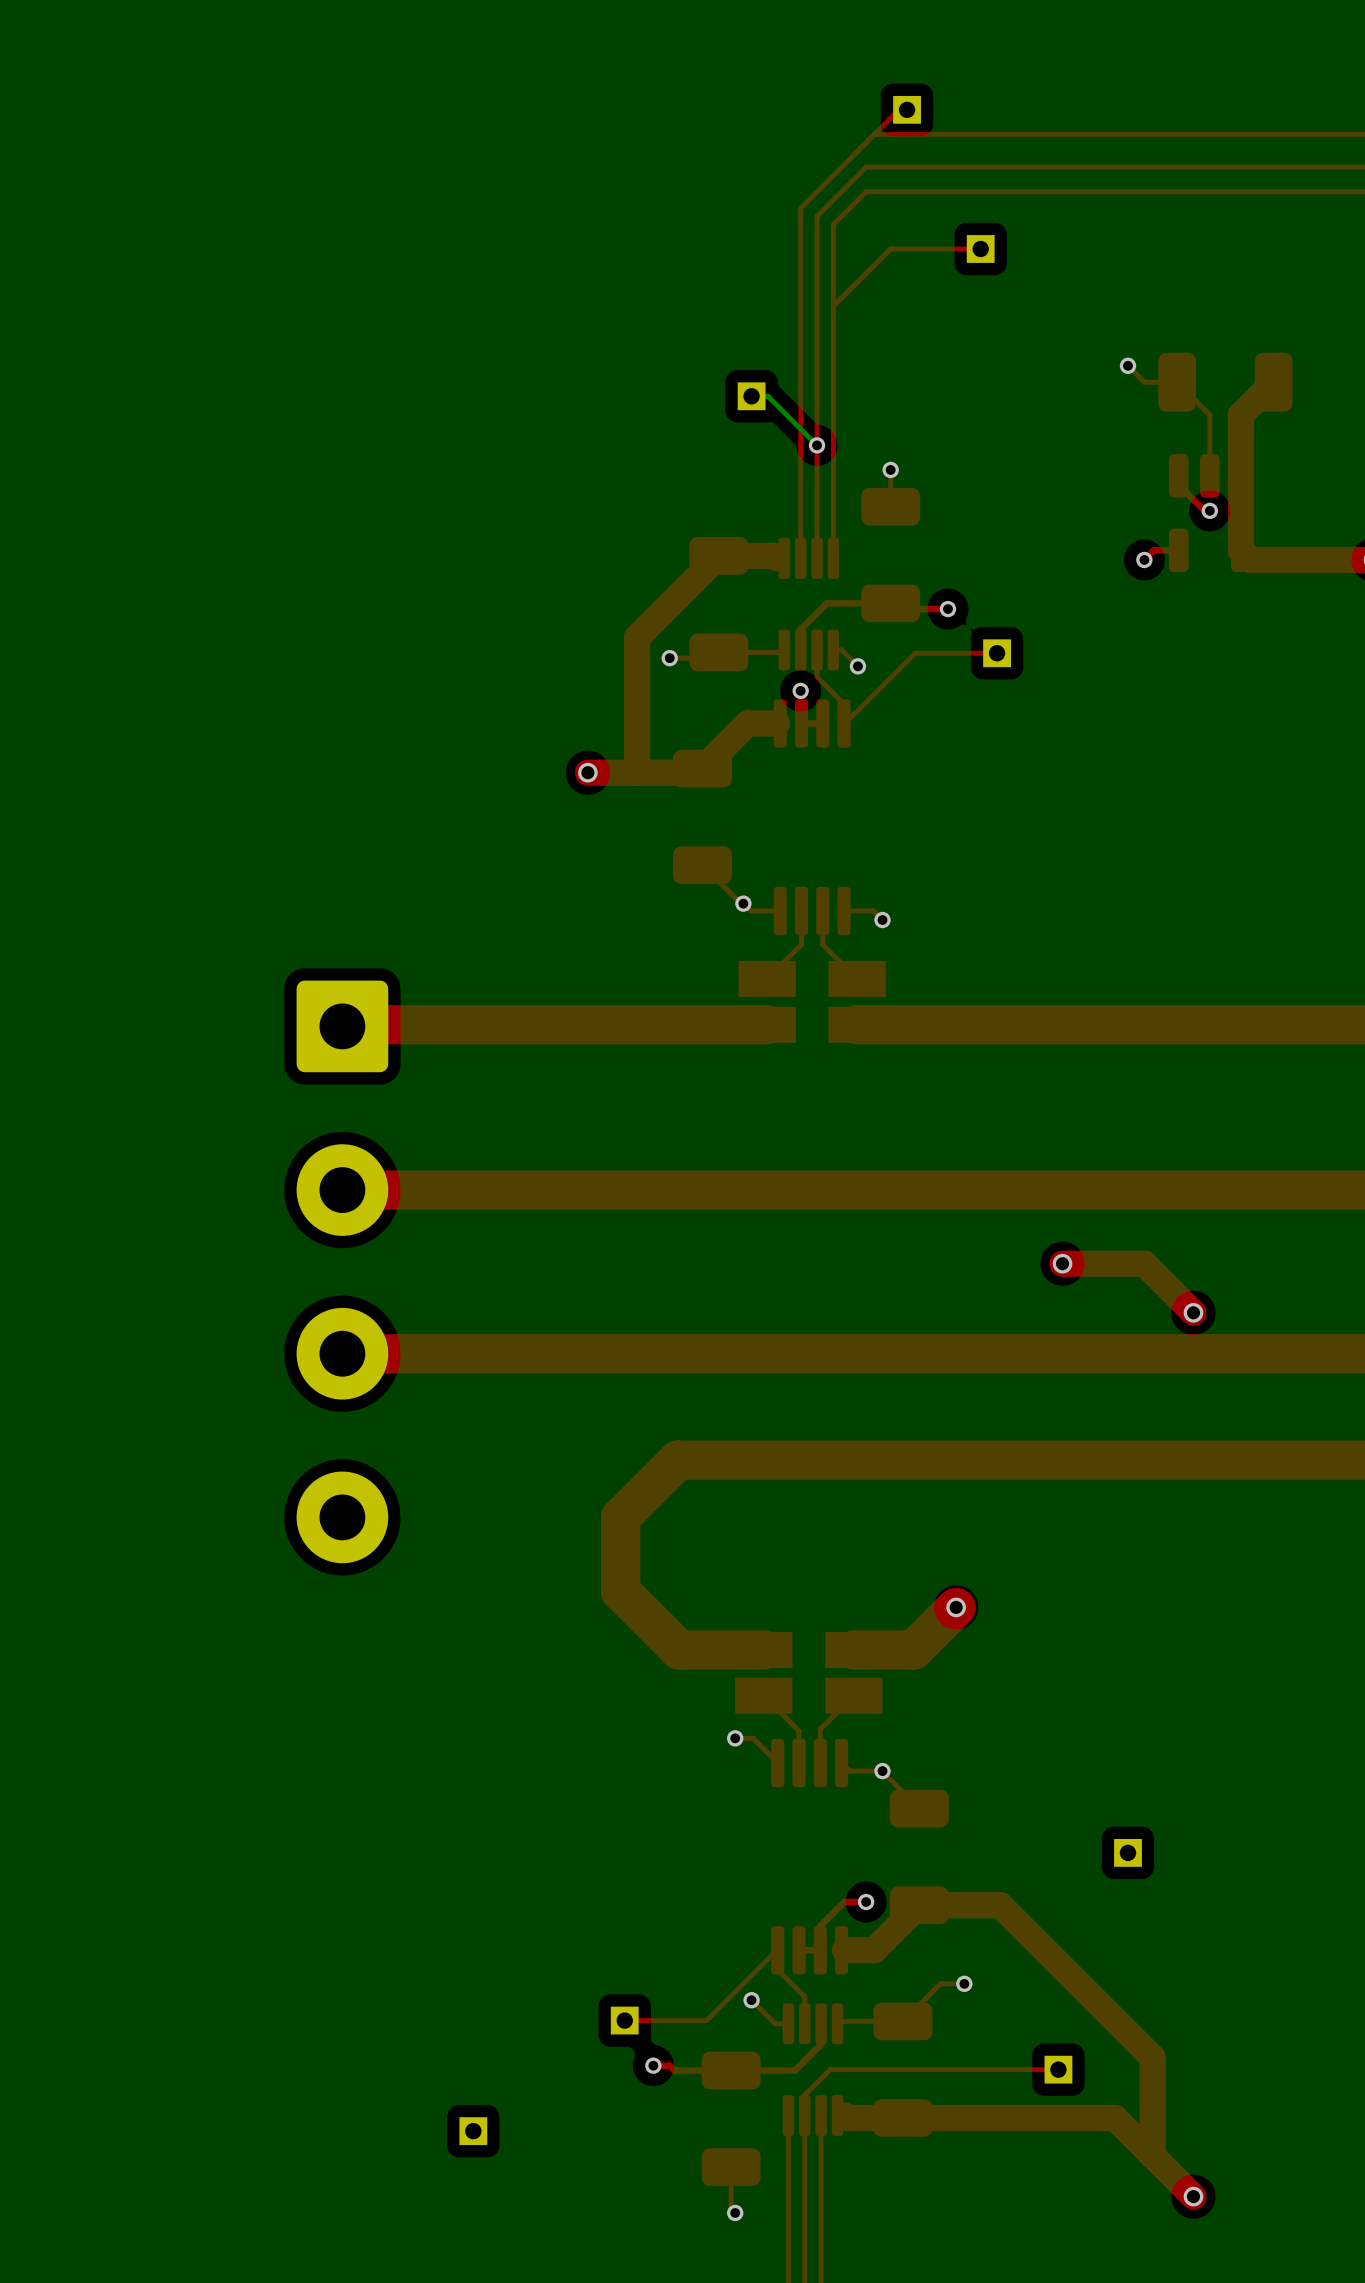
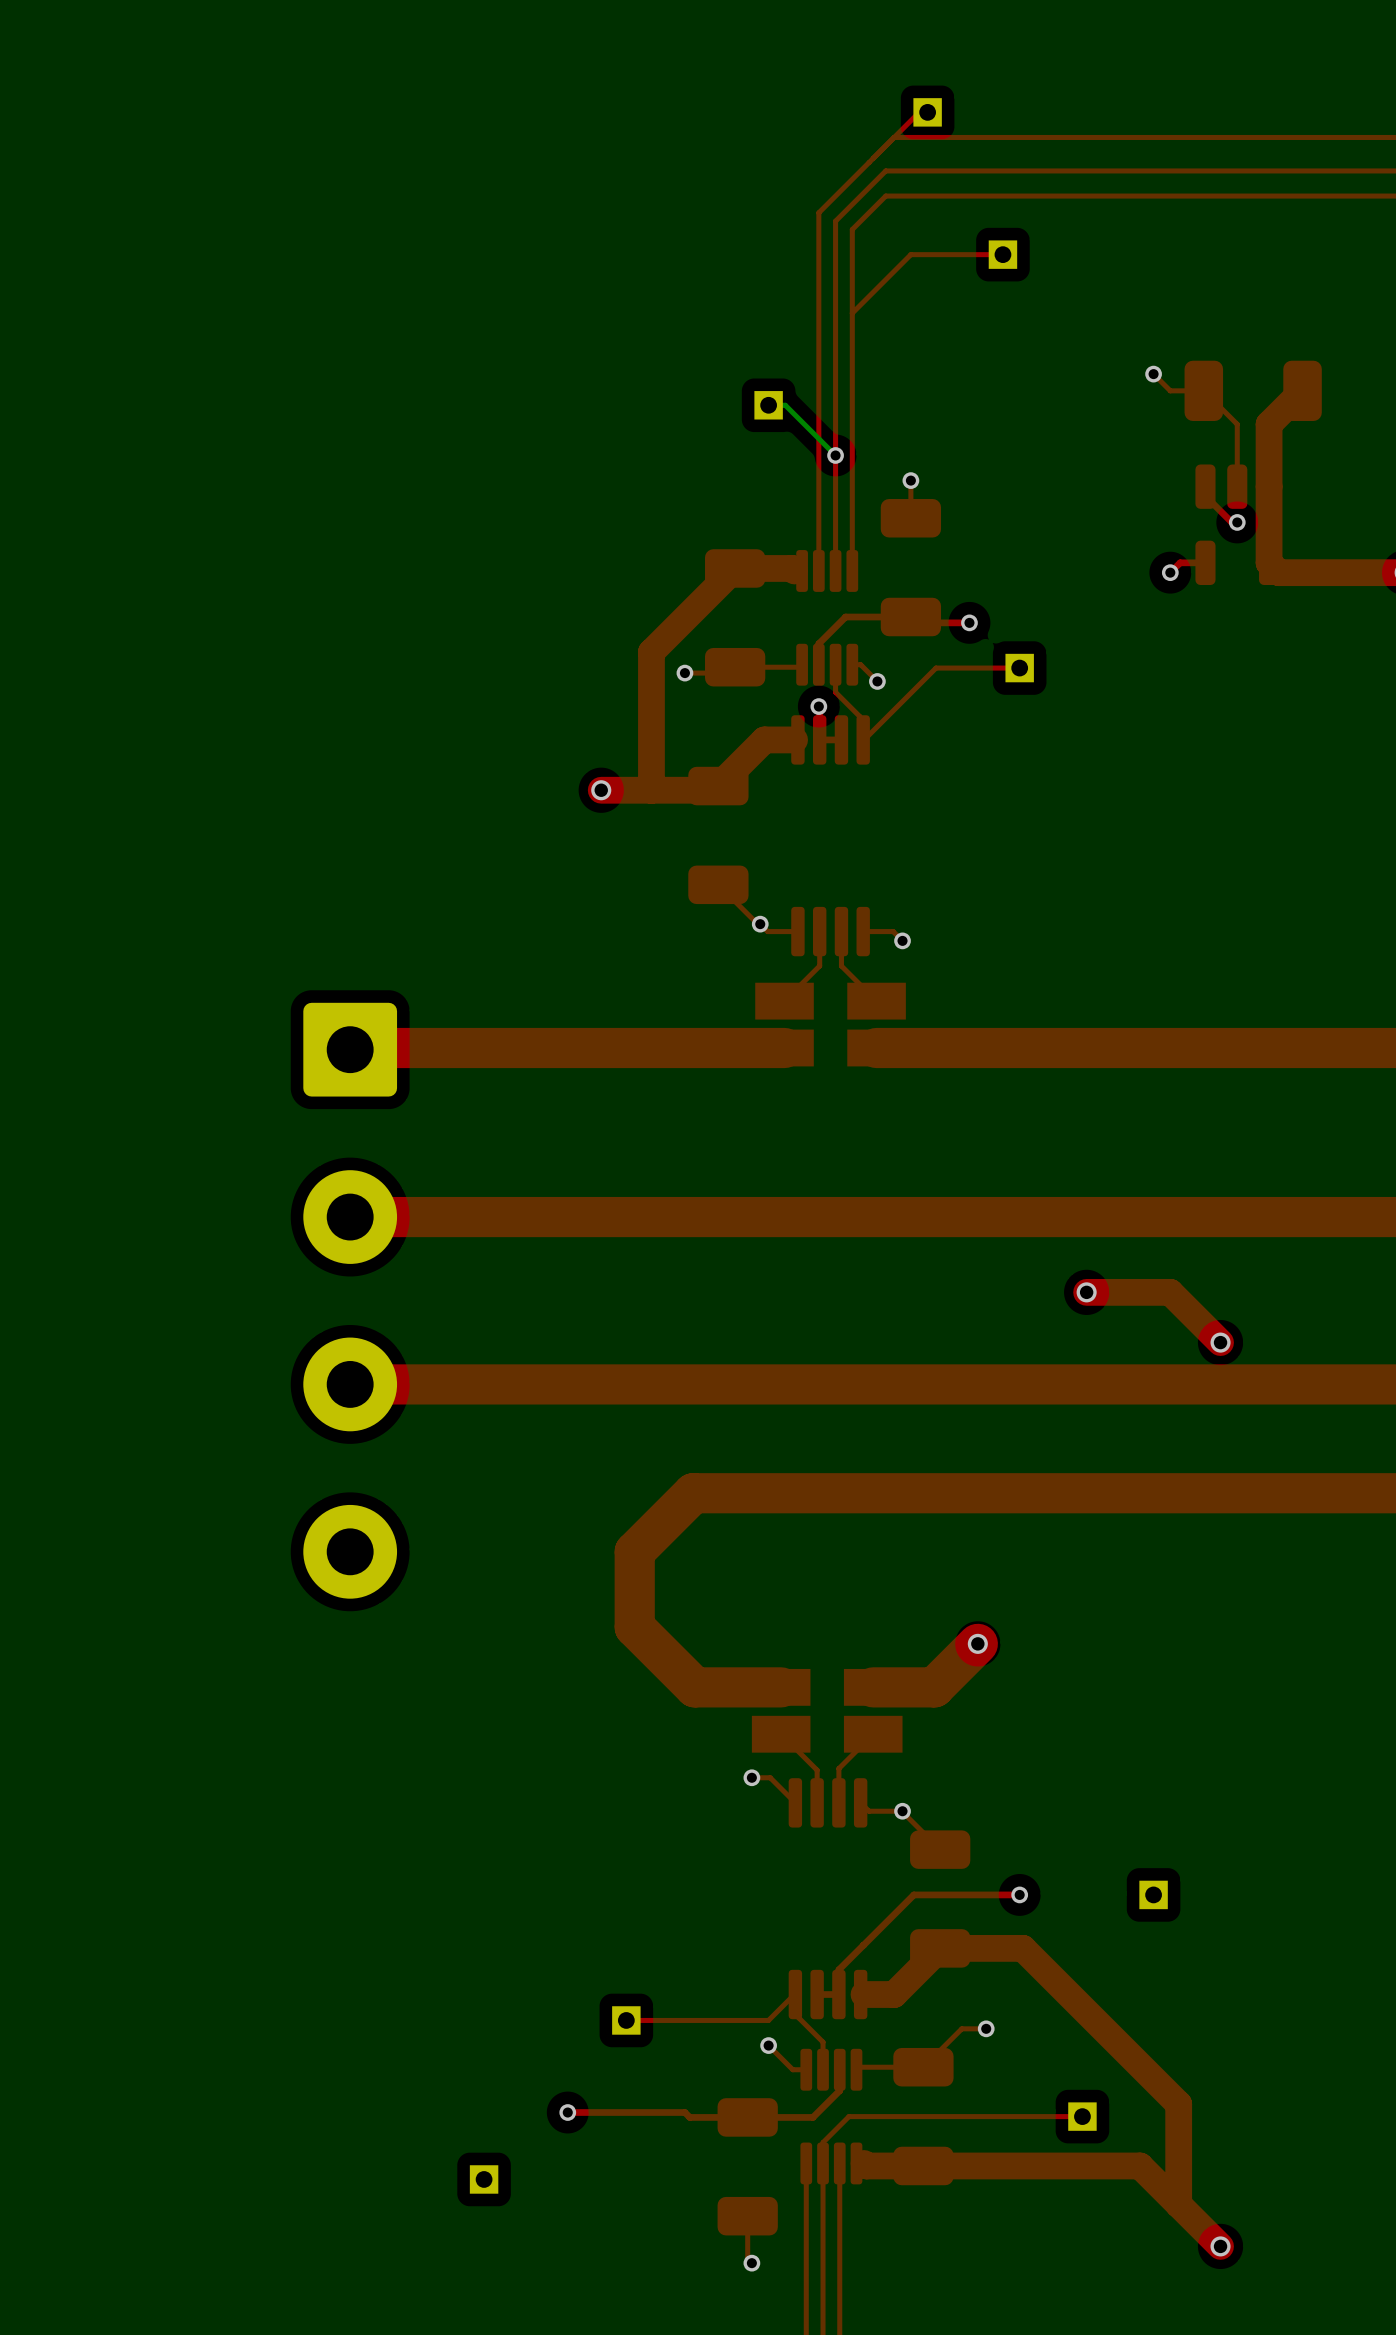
top track: (866, 1902) (844, 1902) -> (1019, 1894) (913, 1894) (863, 1945)
via position: (866, 1902) -> (1019, 1894)
top track: (751, 1975) (706, 2020) (624, 2020) -> (768, 2020) (626, 2020)
part position: (624, 2020) -> (626, 2020)
top track: none -> (668, 2112) (567, 2112)
via position: (653, 2065) -> (567, 2112)

